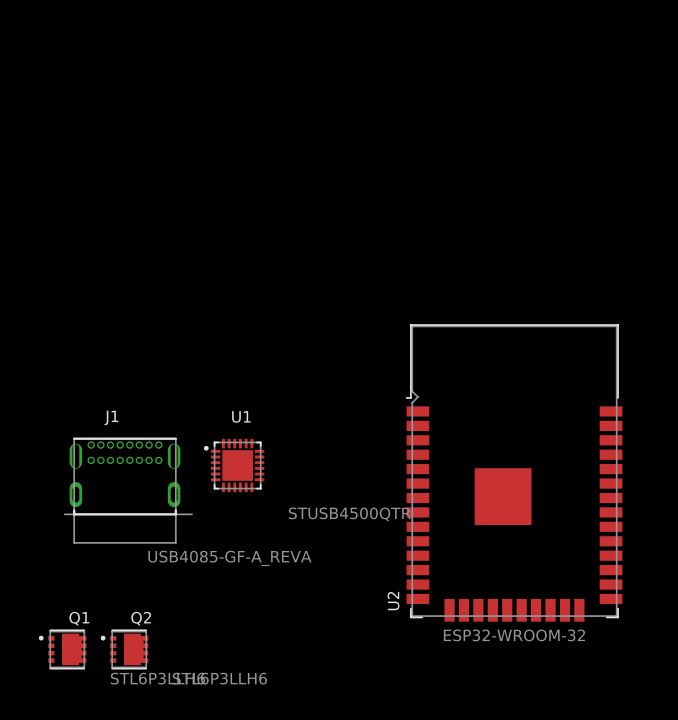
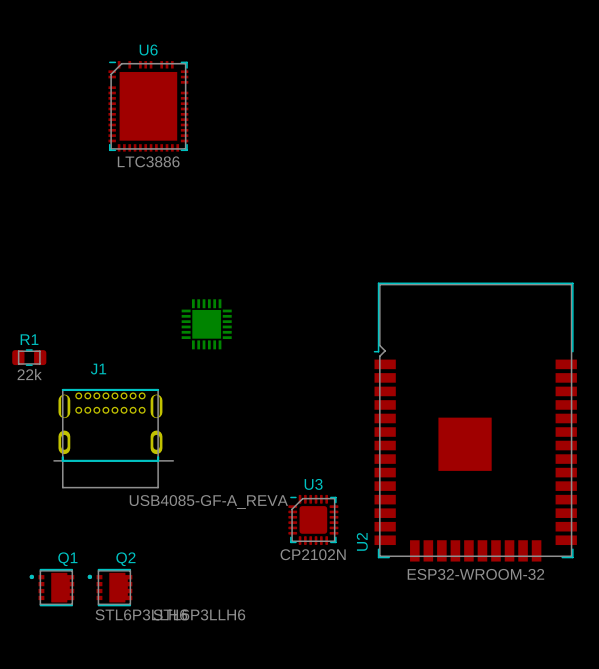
U6: none -> LTC3886 (148, 106)
R1: none -> 22k (29, 357)
U1 side: top (234, 465) -> bottom (206, 324)
U3: none -> CP2102N (313, 519)

